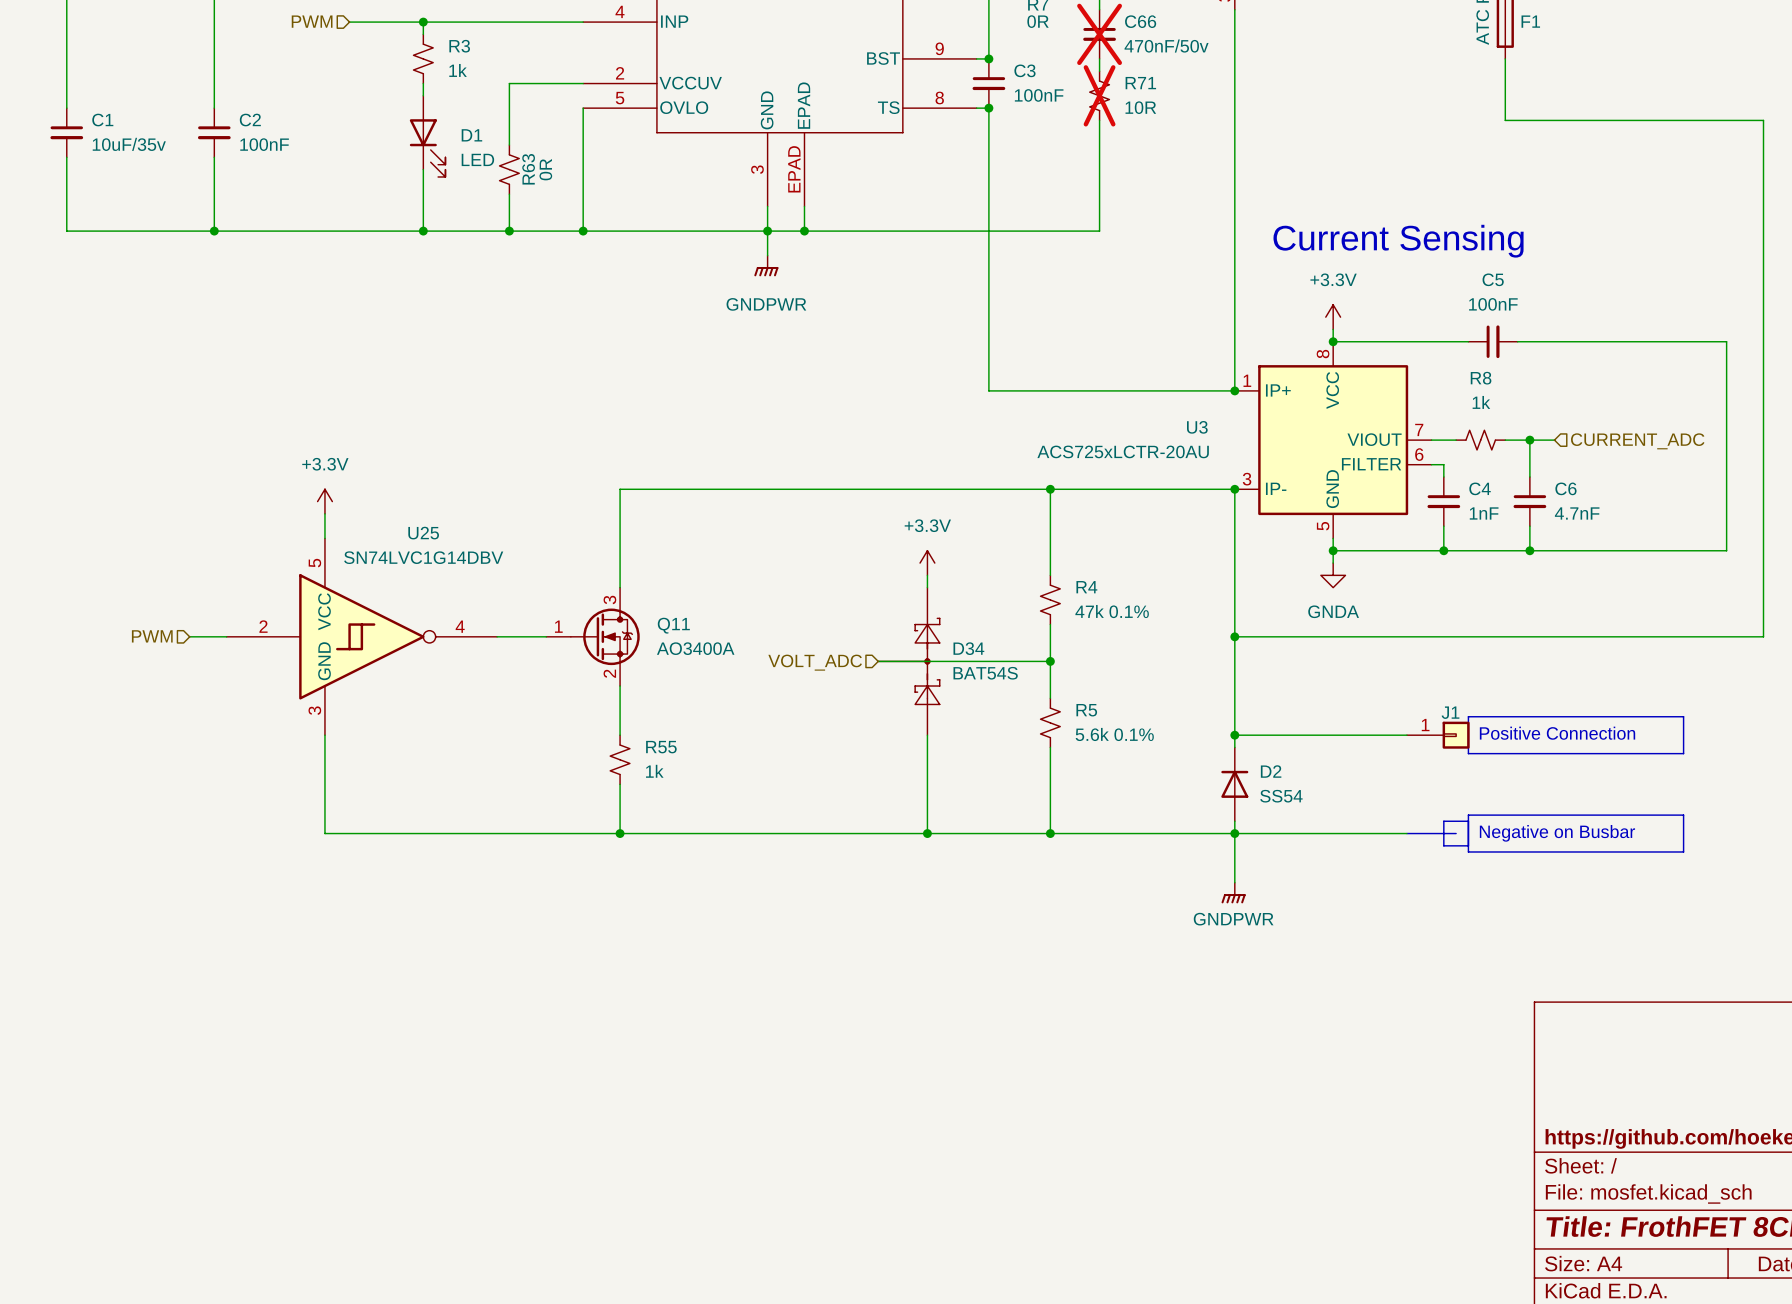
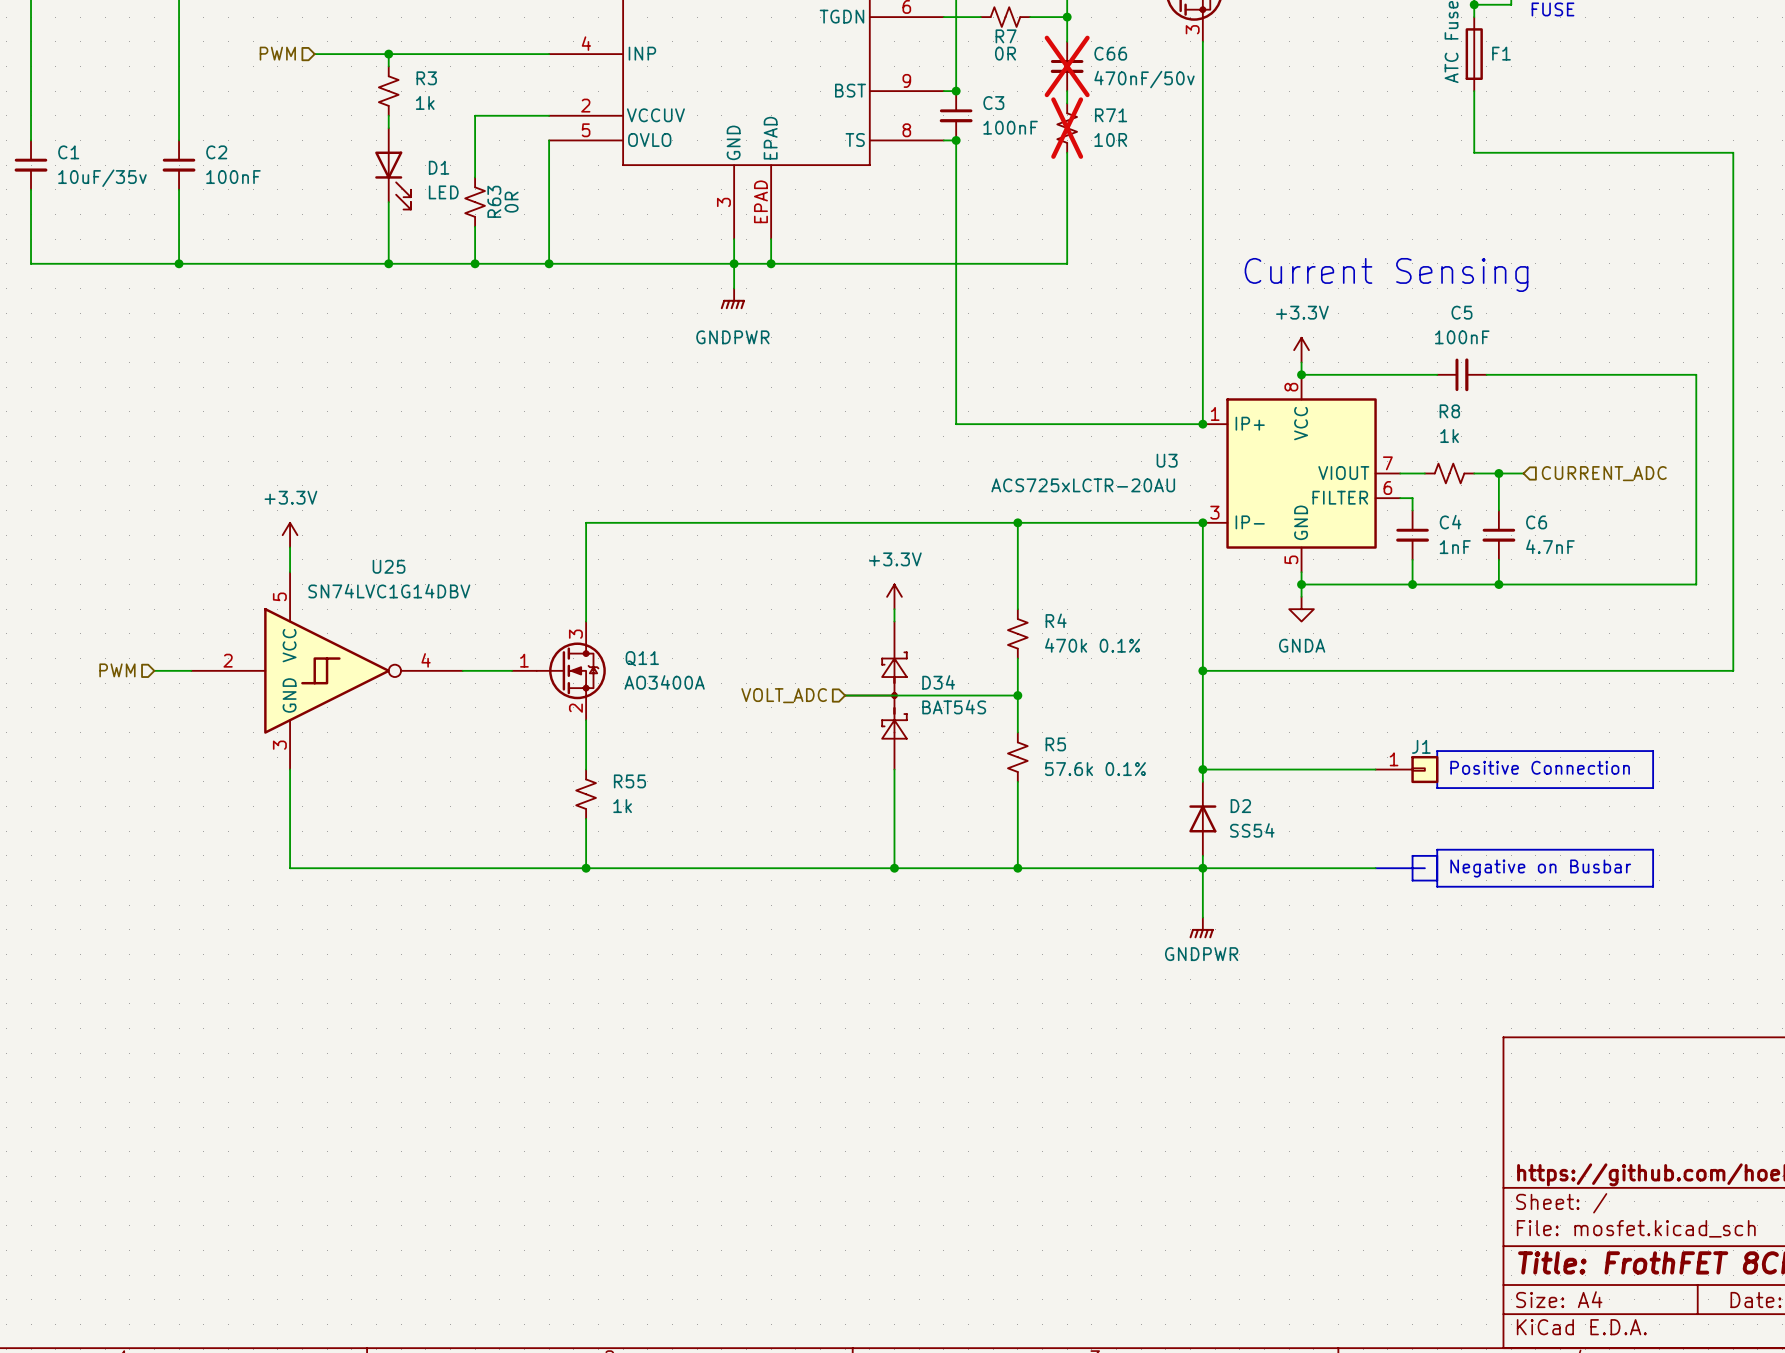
R4 value: 47k 0.1% (1112, 611) -> 470k 0.1% (1092, 645)
R5 value: 5.6k 0.1% (1114, 734) -> 57.6k 0.1% (1095, 769)

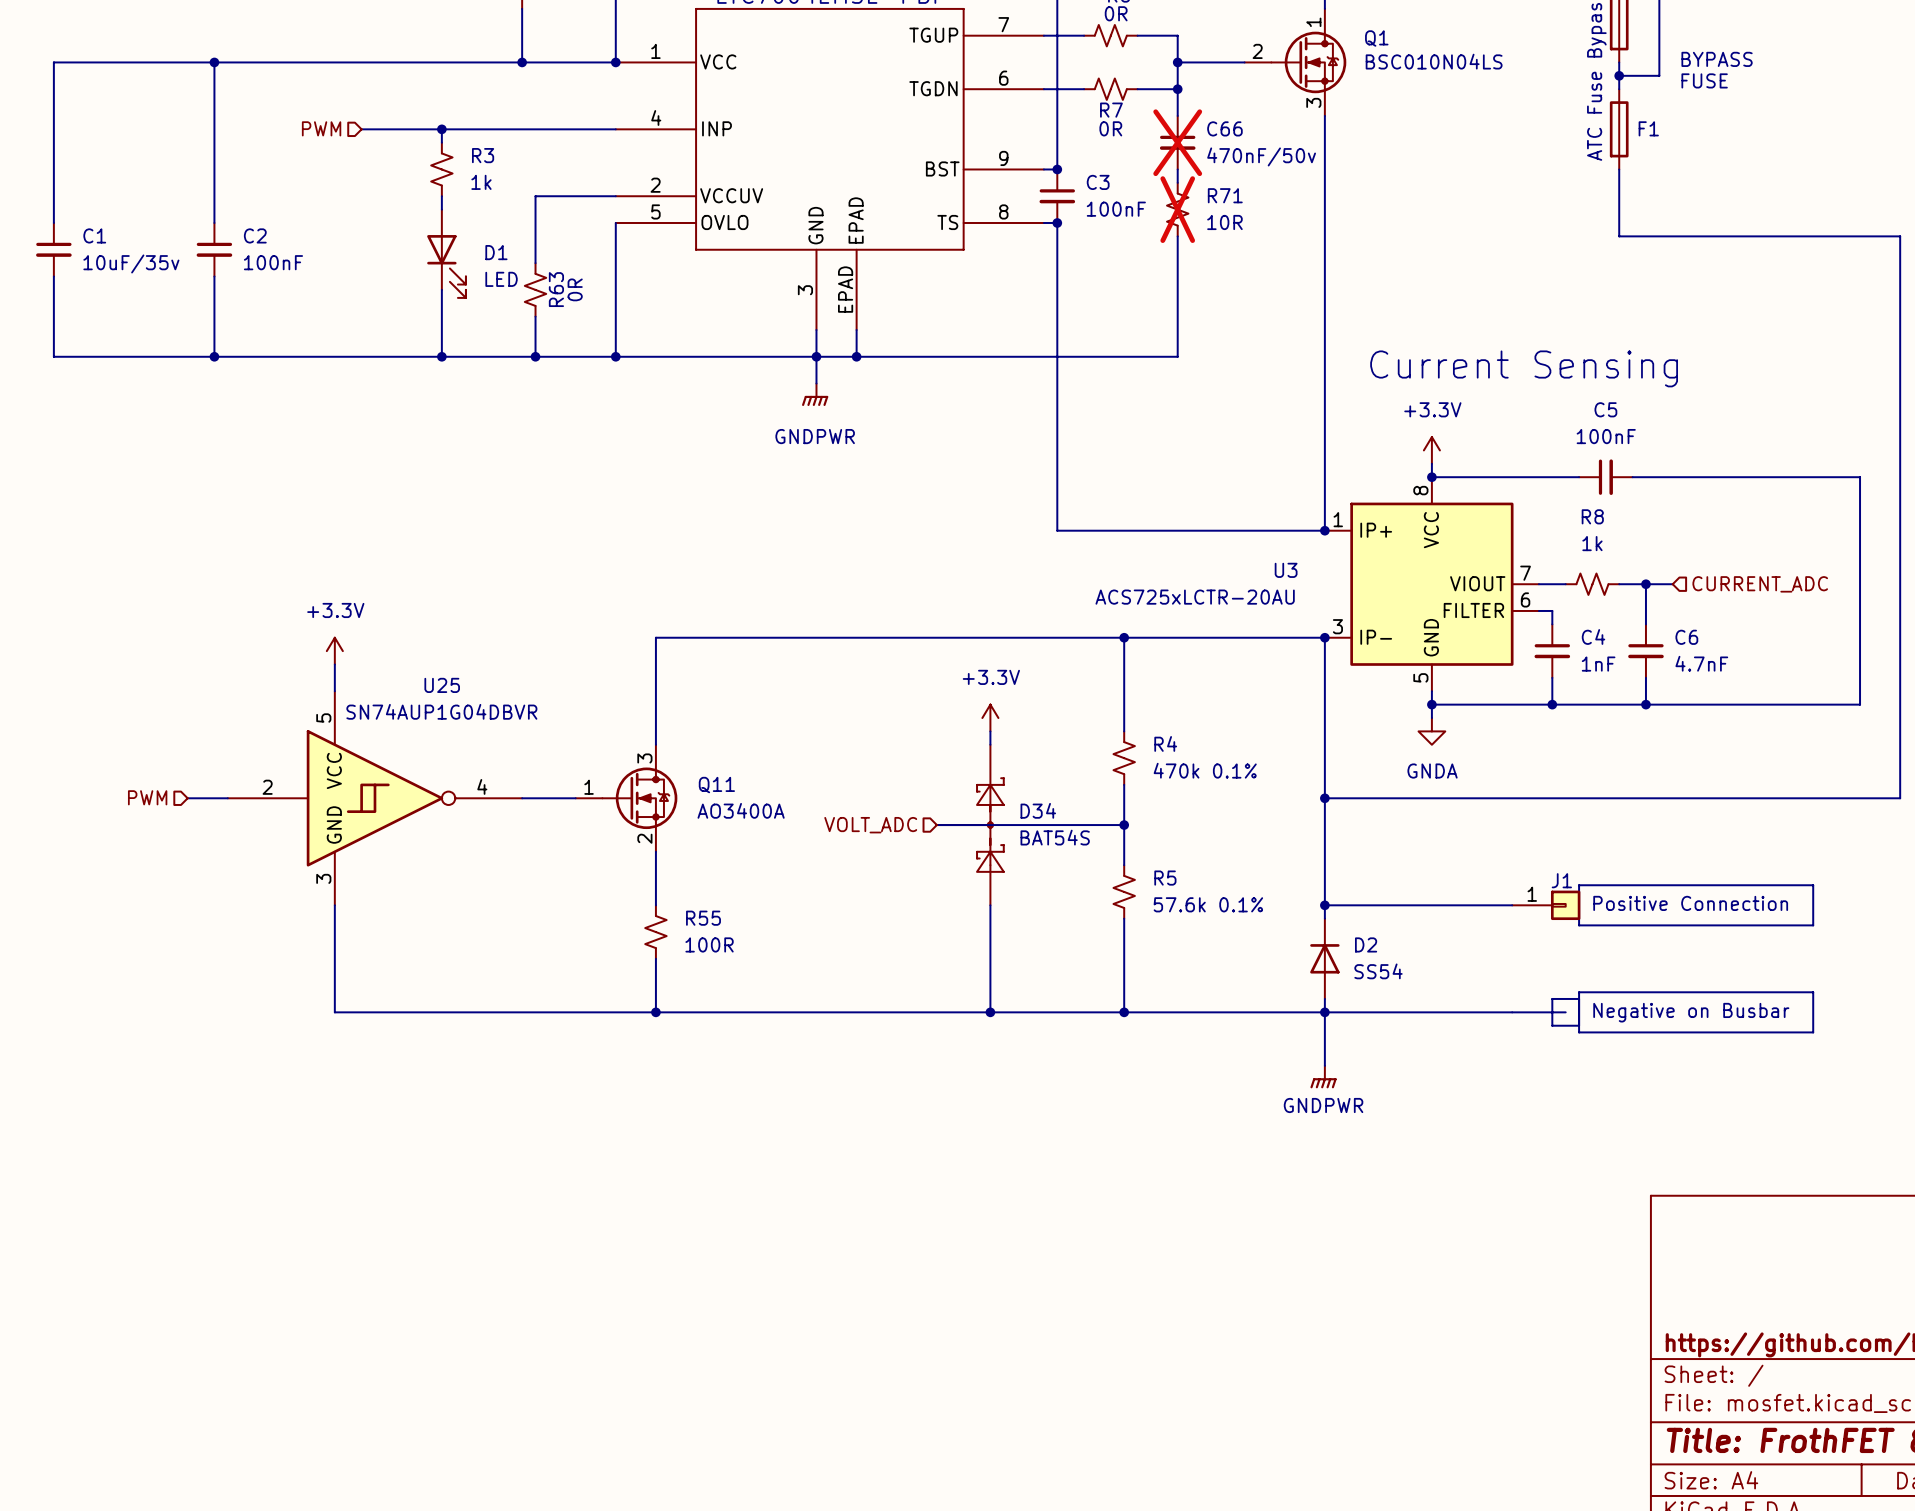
U25 value: SN74LVC1G14DBV (389, 591) -> SN74AUP1G04DBVR (441, 711)
R55 value: 1k (622, 806) -> 100R (709, 944)

